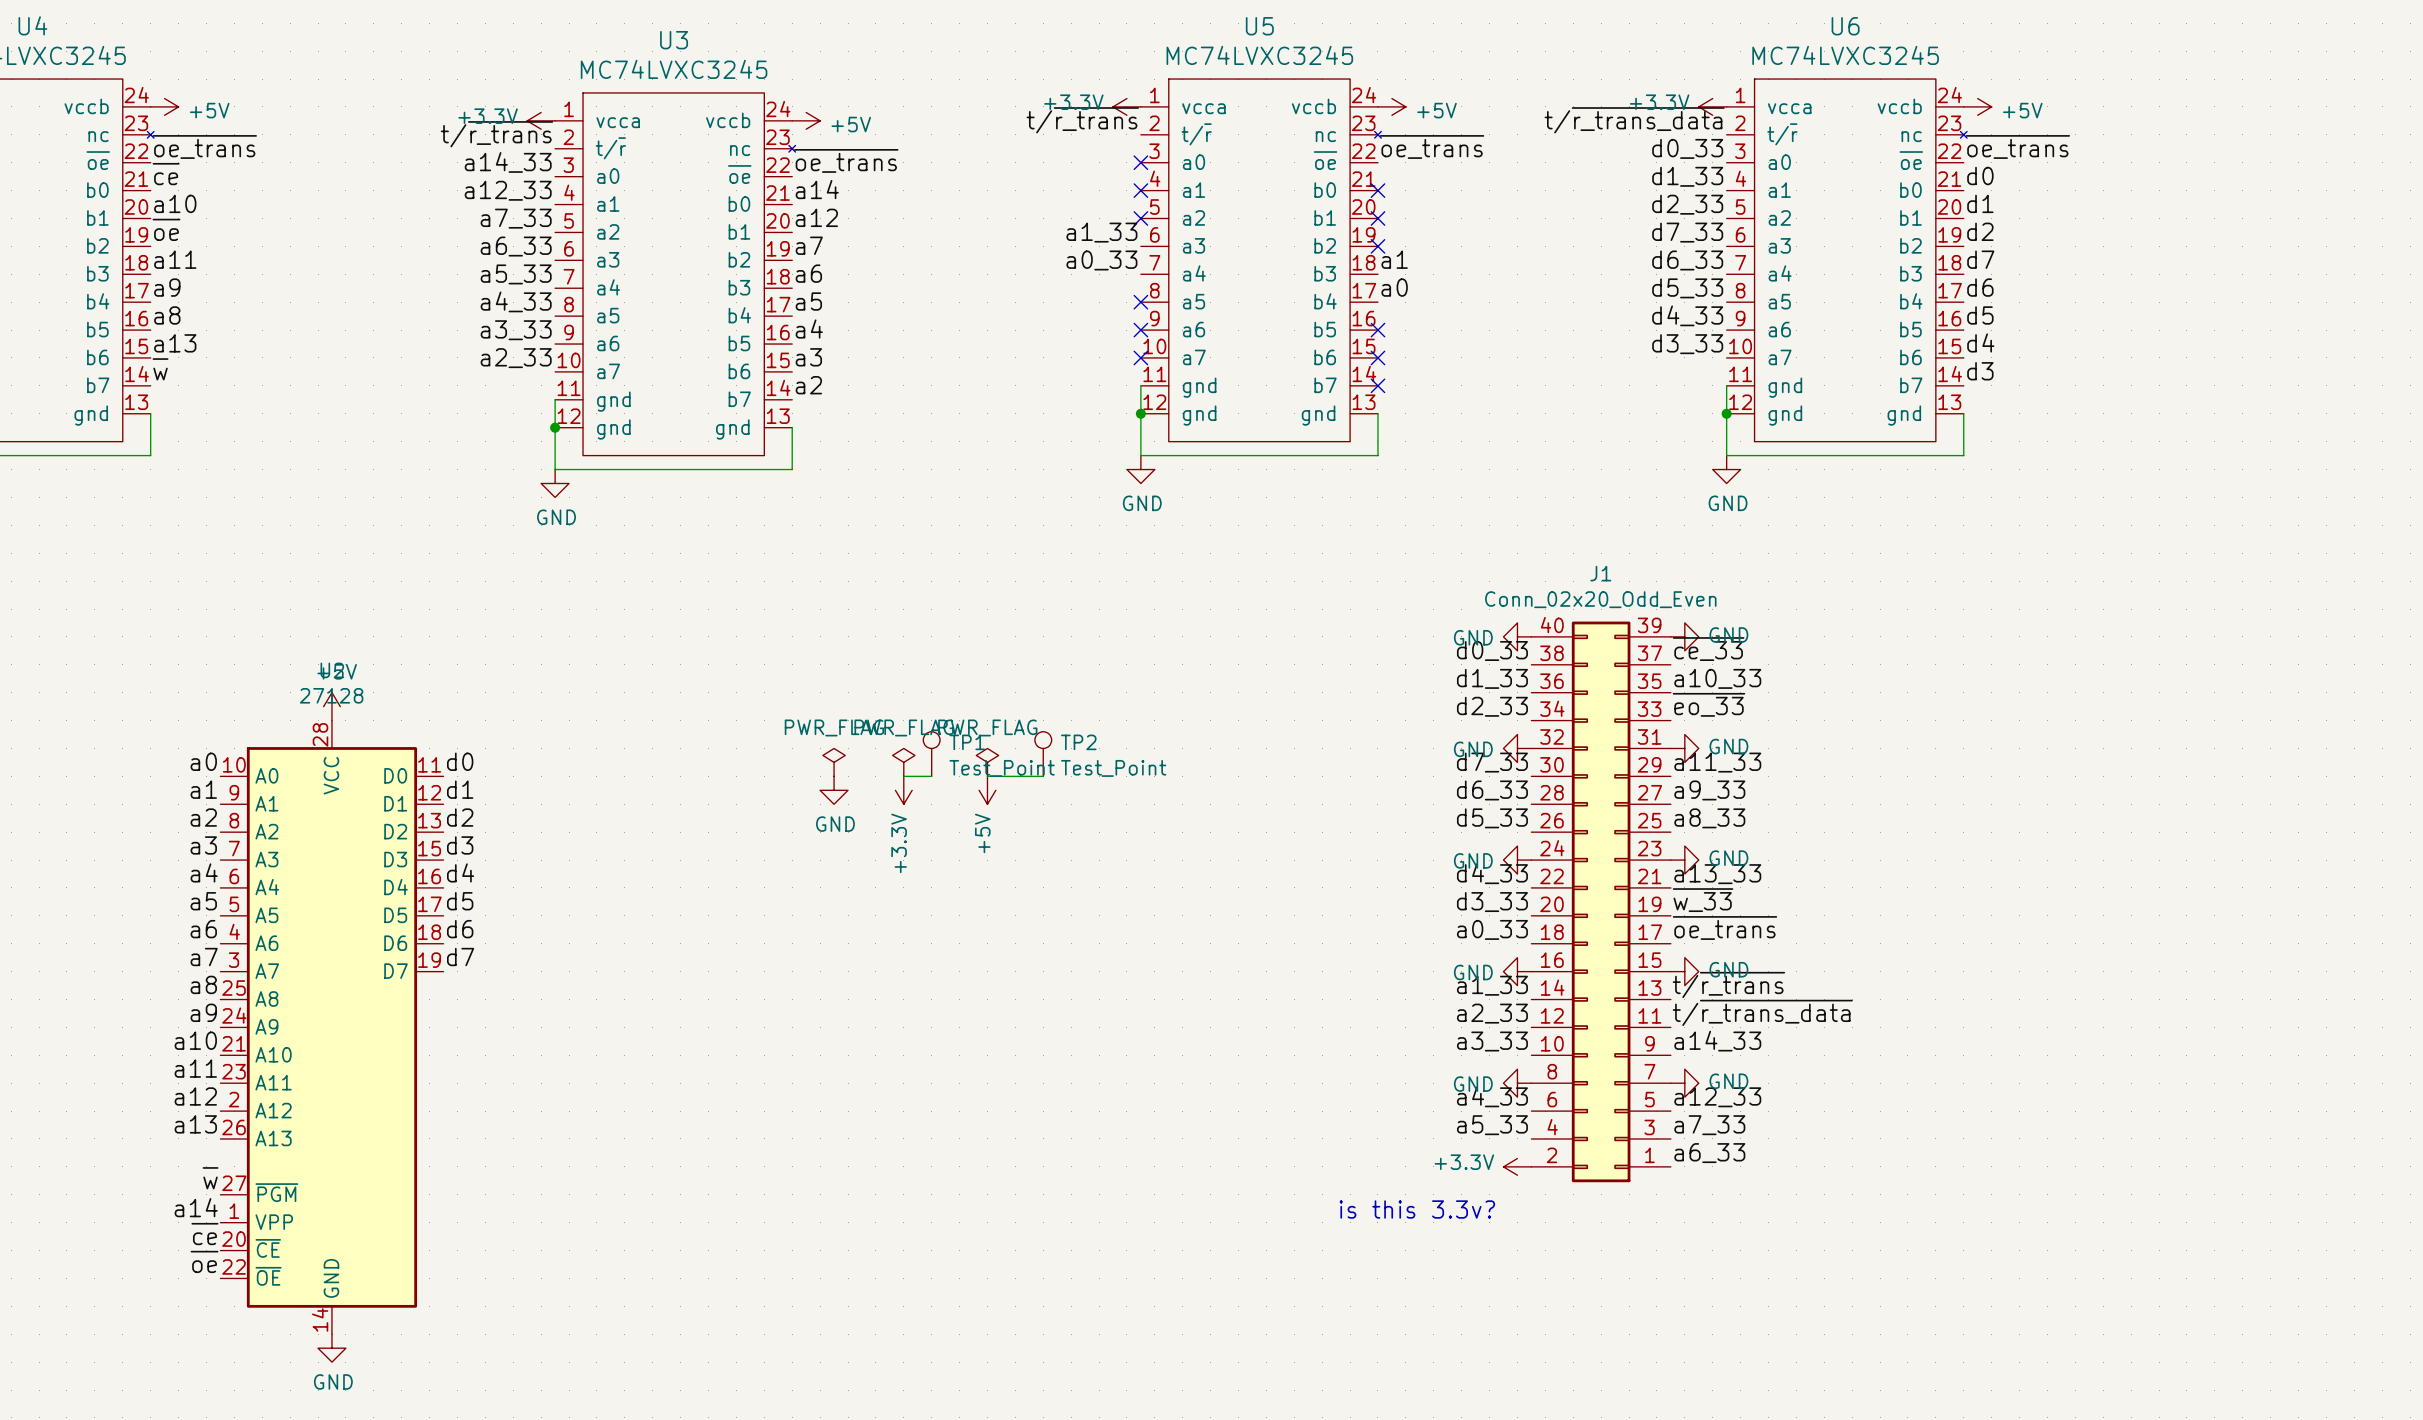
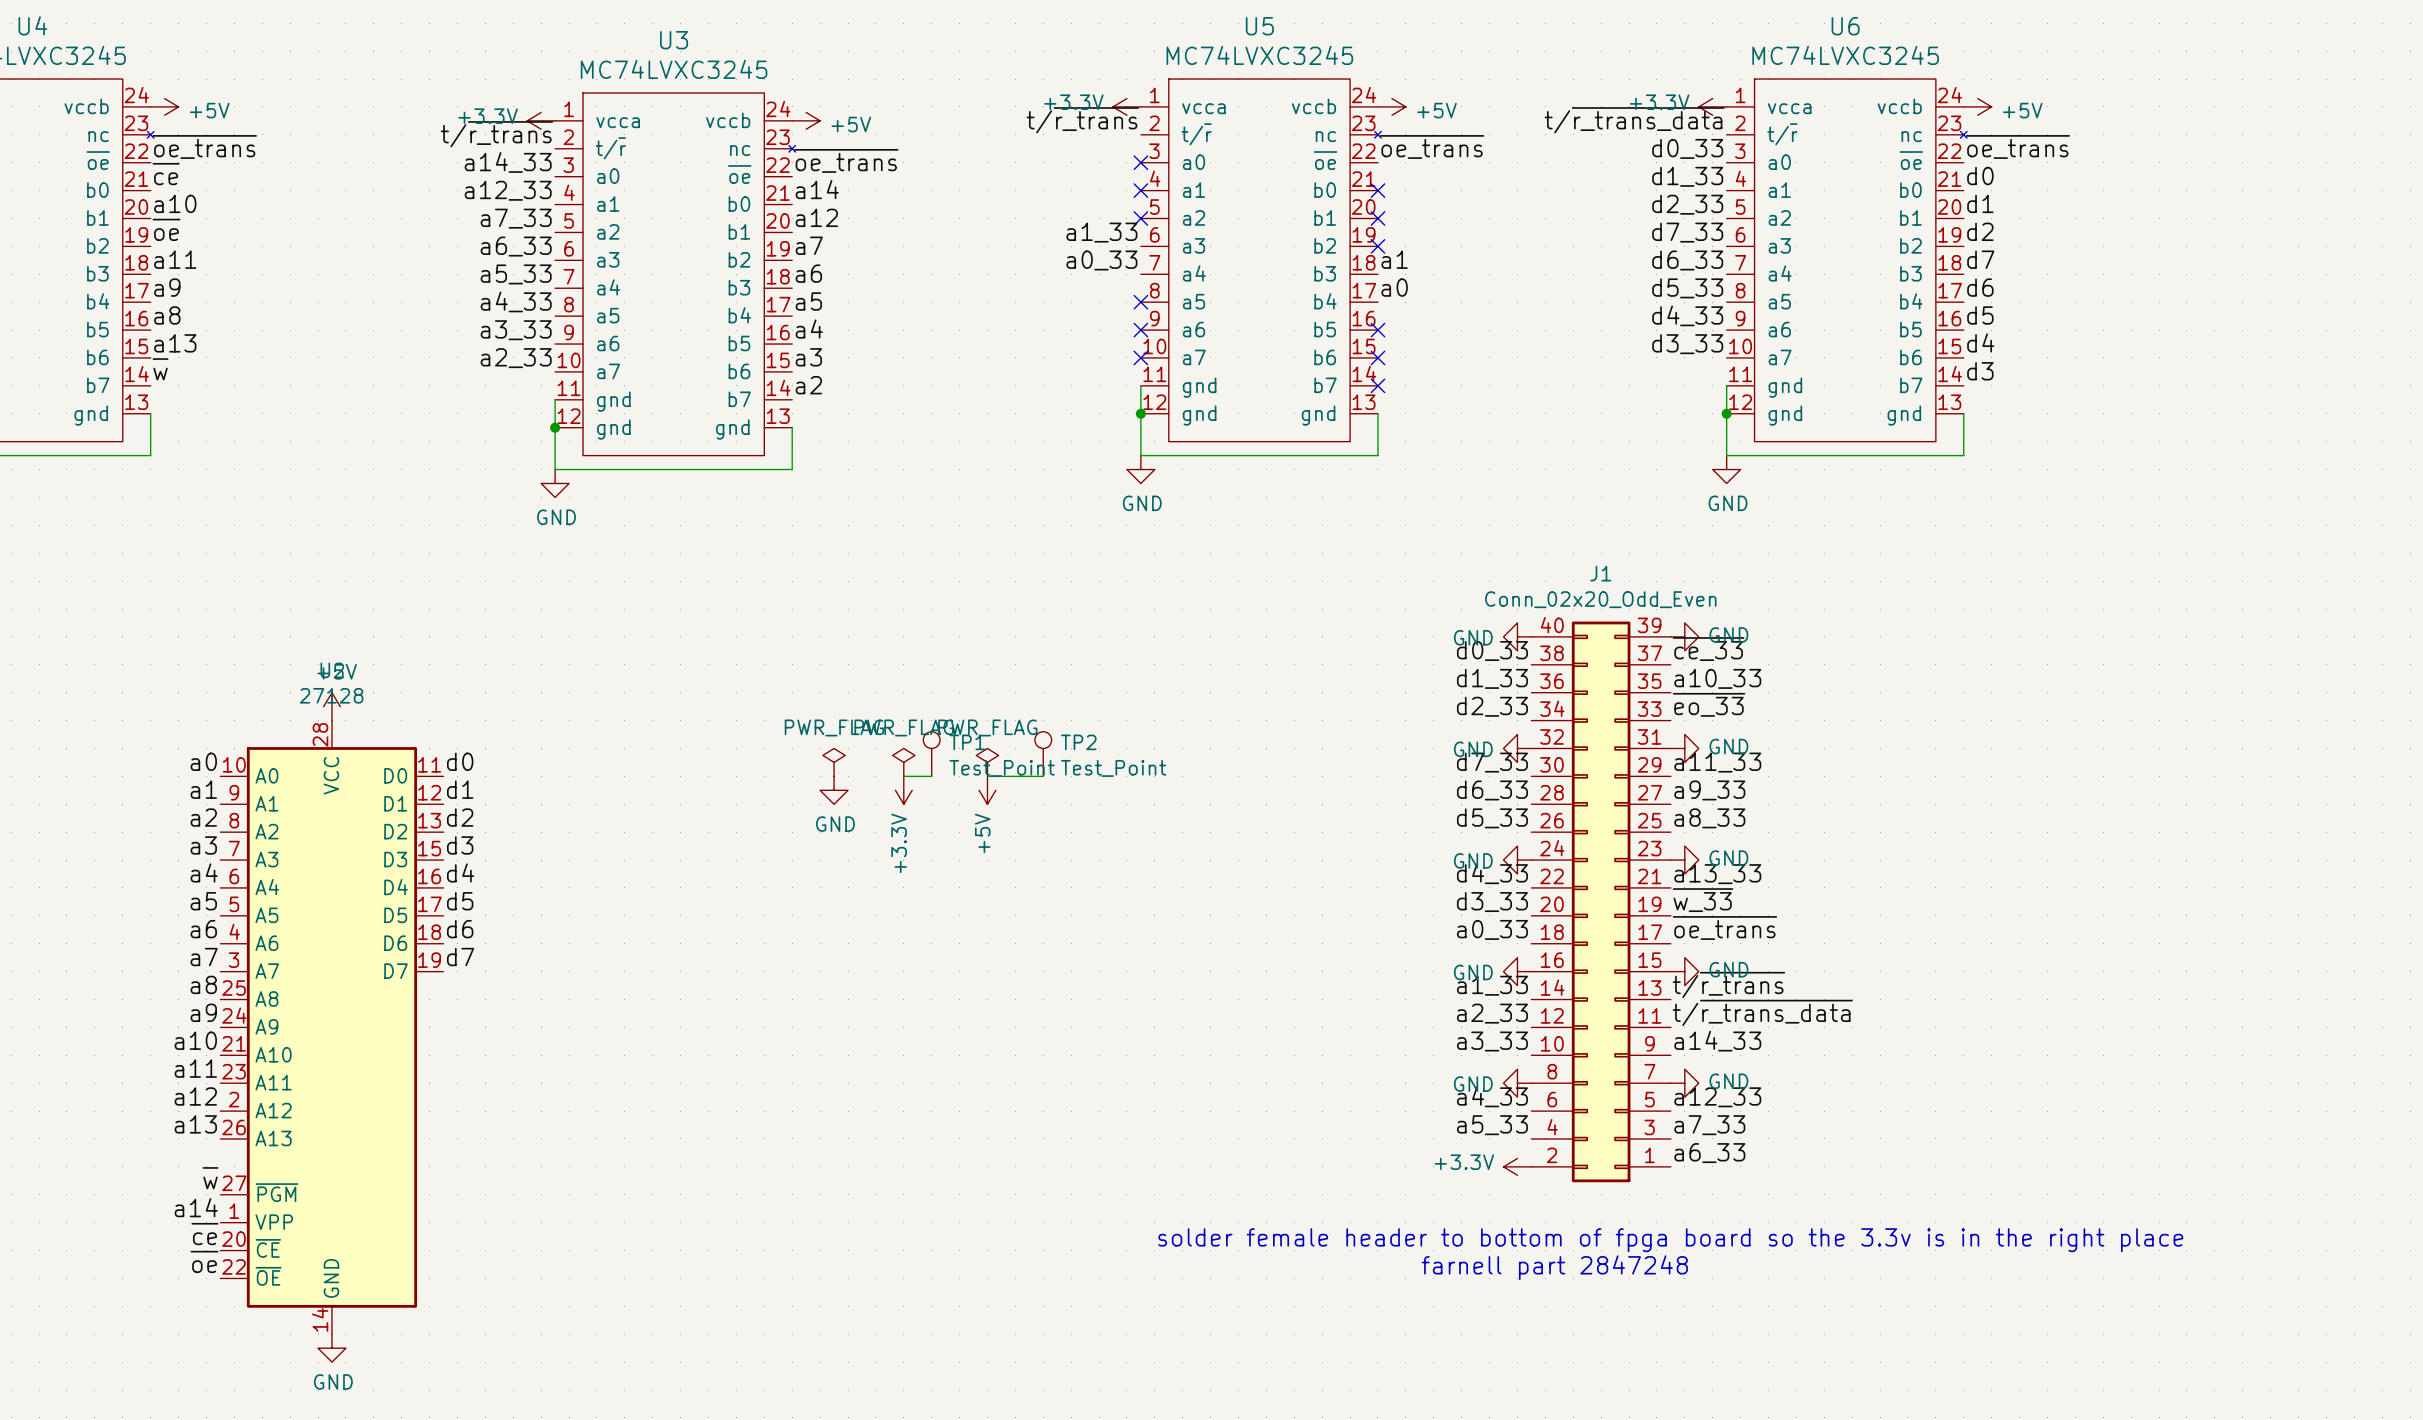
text: is this 3.3v? (1417, 1209) -> none
text: none -> solder female header to bottom of fpga board so the 3.3v is in the right place (1670, 1240)
text: none -> farnell part 2847248 (1554, 1267)

